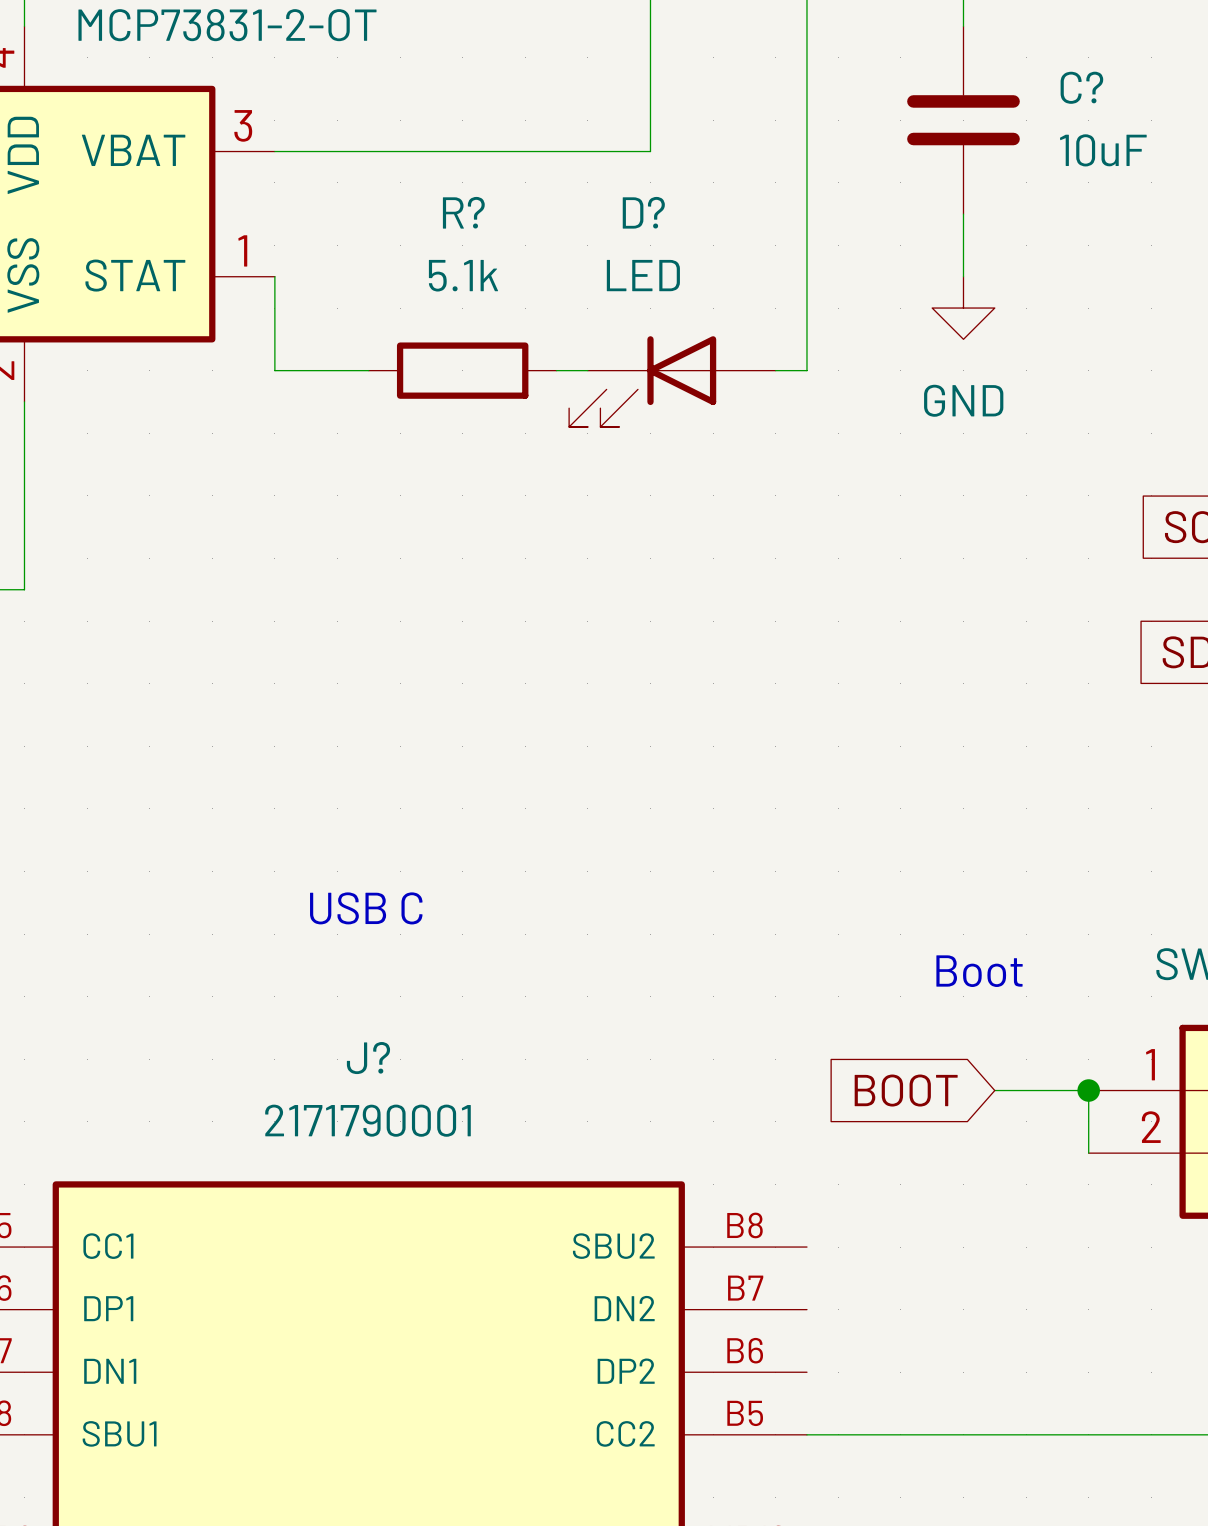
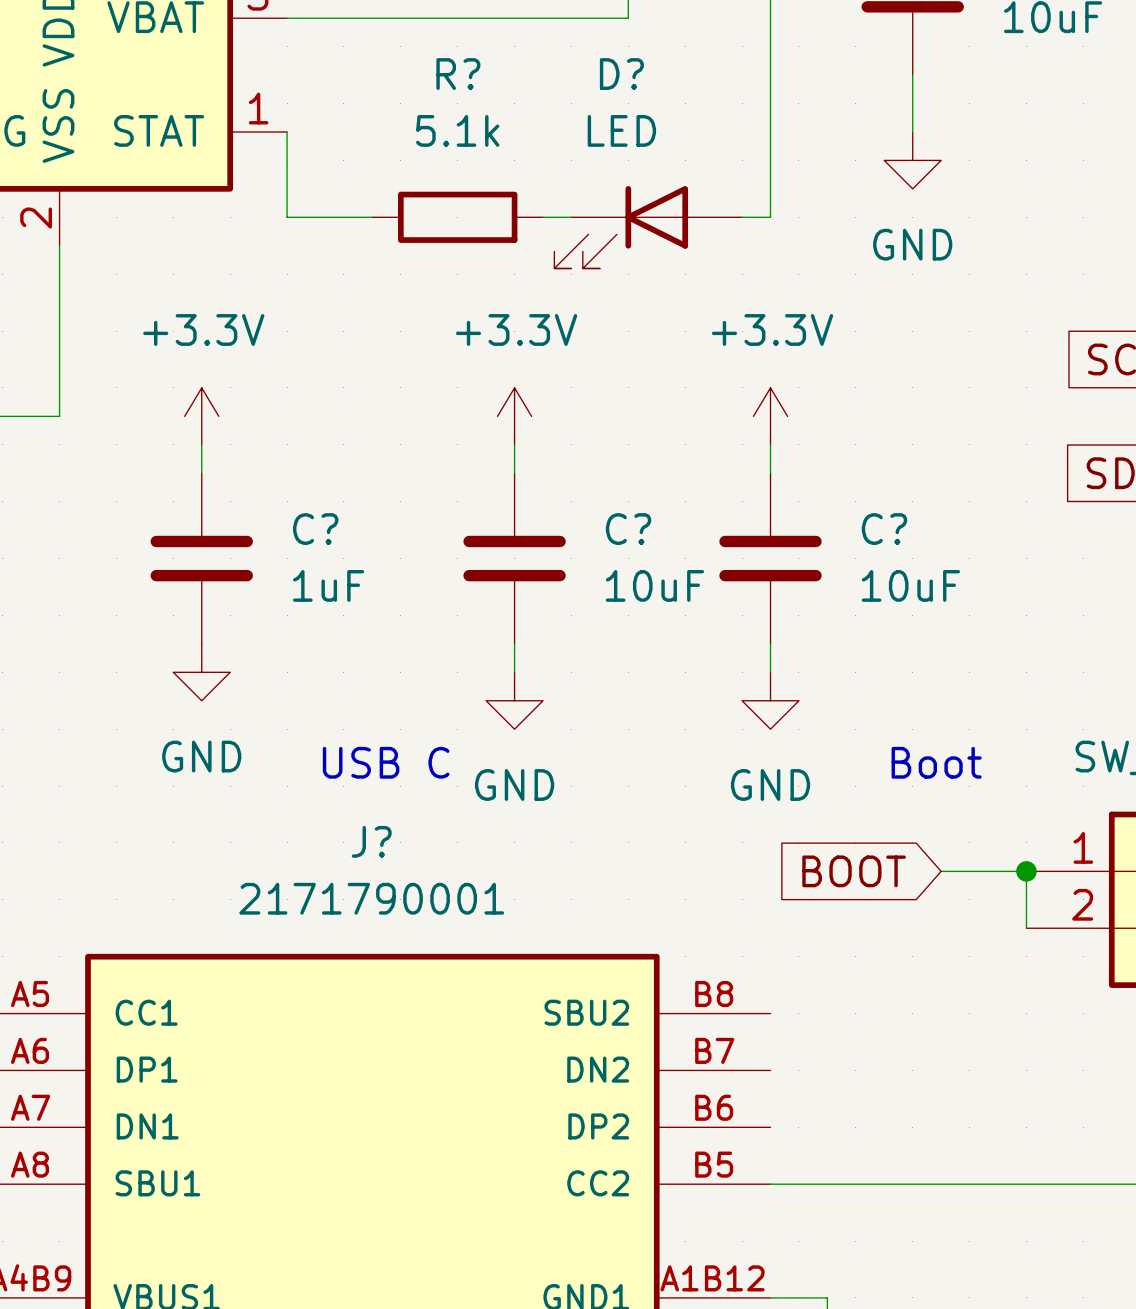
power symbol: none -> +3.3V (201, 416)
power symbol: none -> +3.3V (514, 416)
power symbol: none -> +3.3V (770, 416)
wire: none -> (201, 444) (201, 473)
wire: none -> (514, 444) (514, 473)
wire: none -> (770, 444) (770, 473)
C?: none -> 1uF (201, 558)
C?: none -> 10uF (514, 558)
C?: none -> 10uF (770, 558)
wire: none -> (514, 643) (514, 672)
wire: none -> (770, 643) (770, 672)
power symbol: none -> GND (201, 672)
power symbol: none -> GND (514, 700)
power symbol: none -> GND (770, 700)
text position: USB C (366, 908) -> USB C (386, 762)

